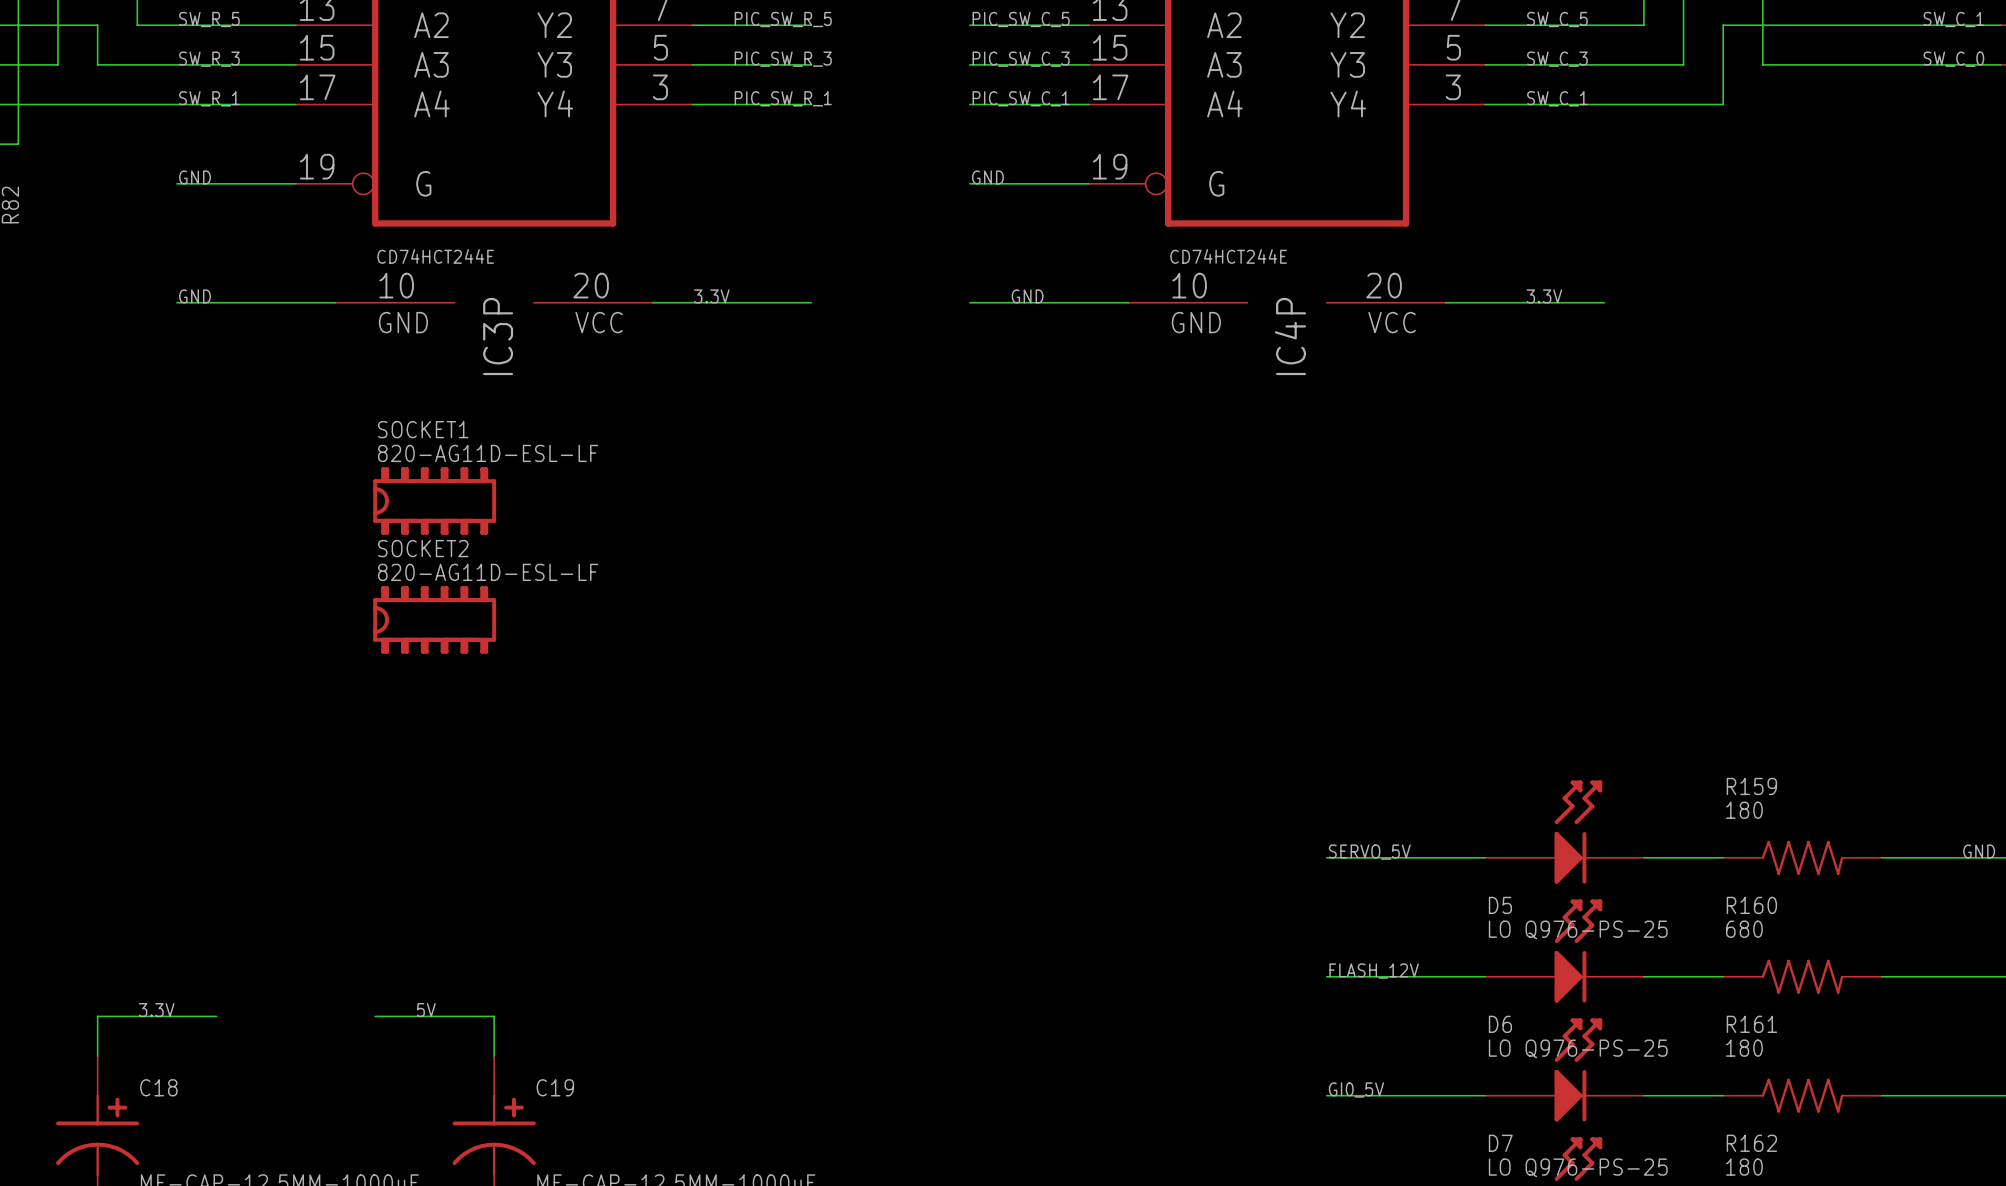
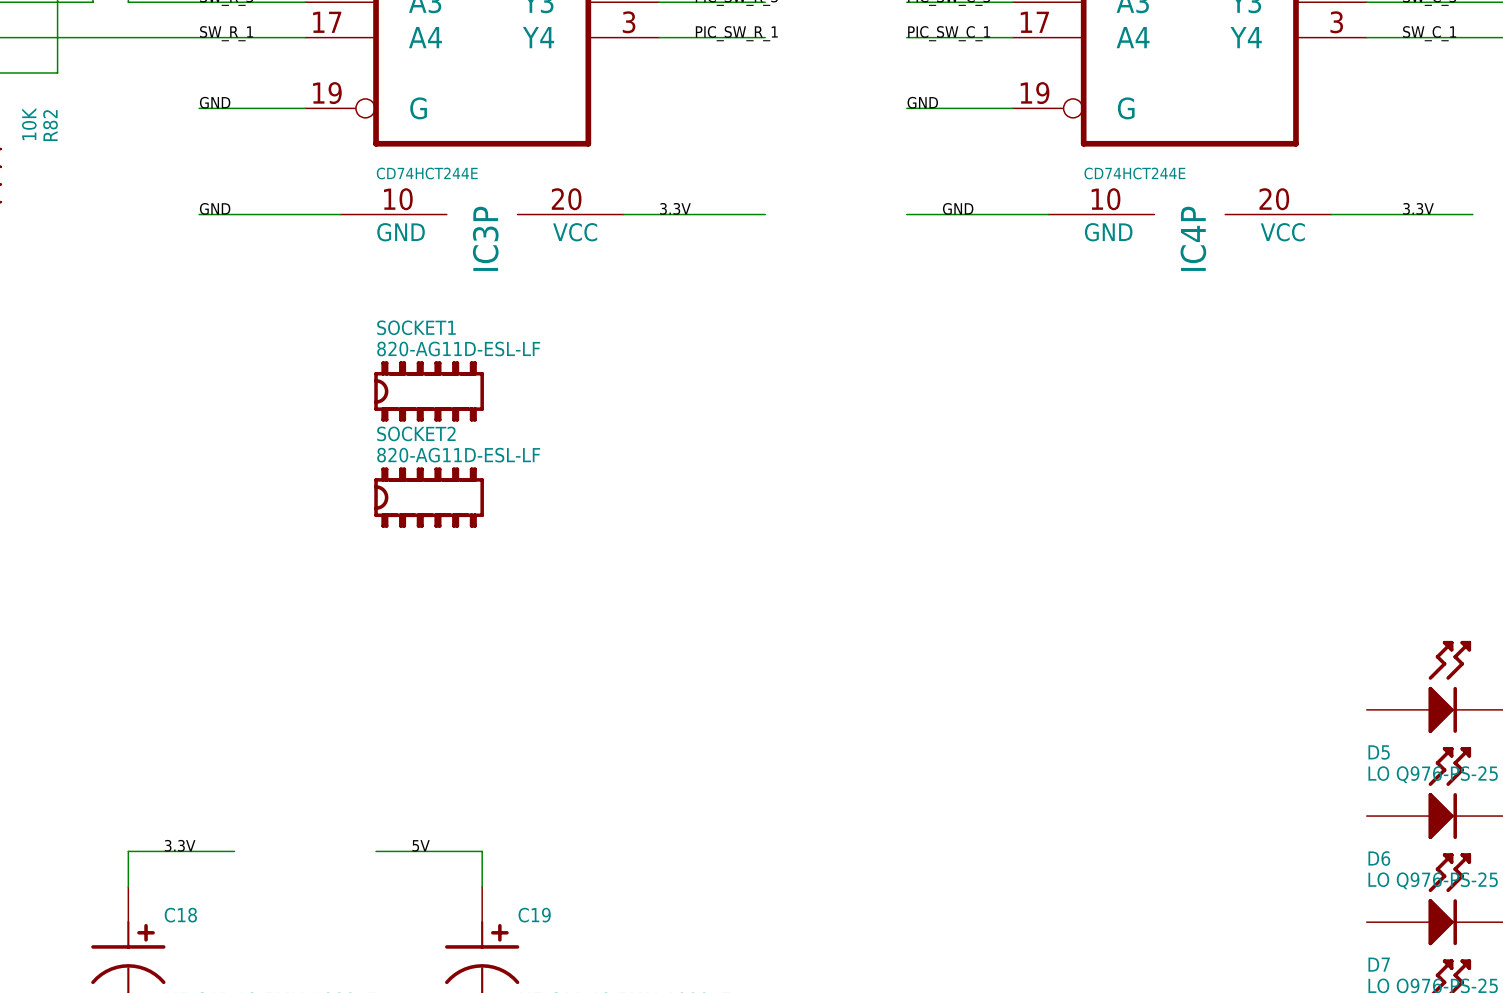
label: SERVO_5V (1369, 852) -> none
wire: (1326, 857) (1485, 857) -> none
label: FLASH_12V (1374, 971) -> none
wire: (1326, 976) (1485, 976) -> none
label: GI0_5V (1356, 1089) -> none
wire: (1326, 1095) (1485, 1095) -> none

